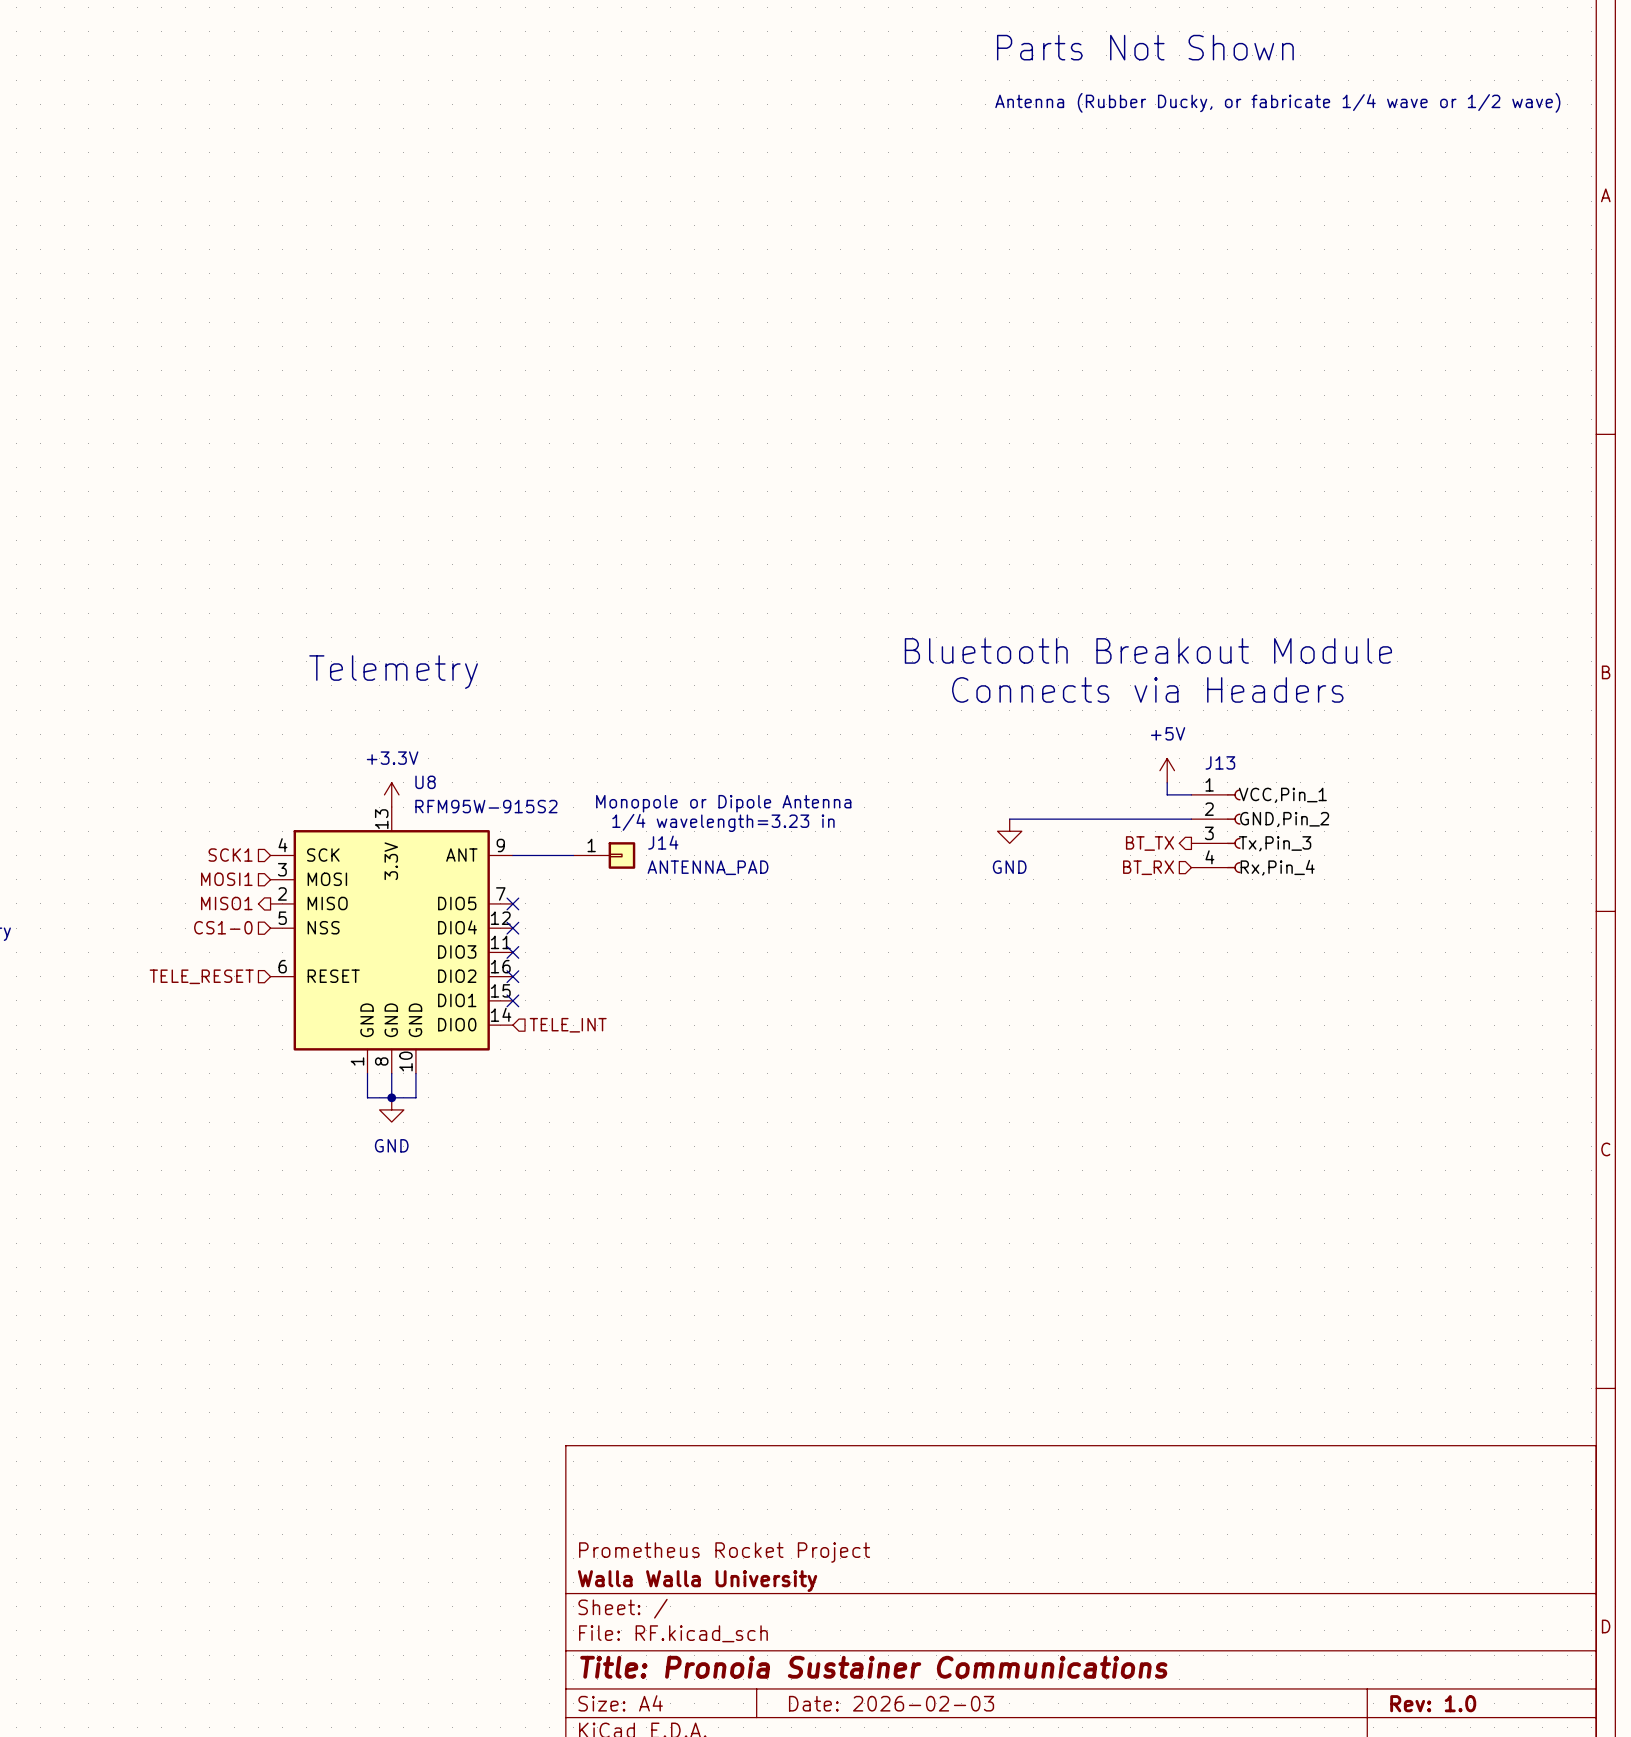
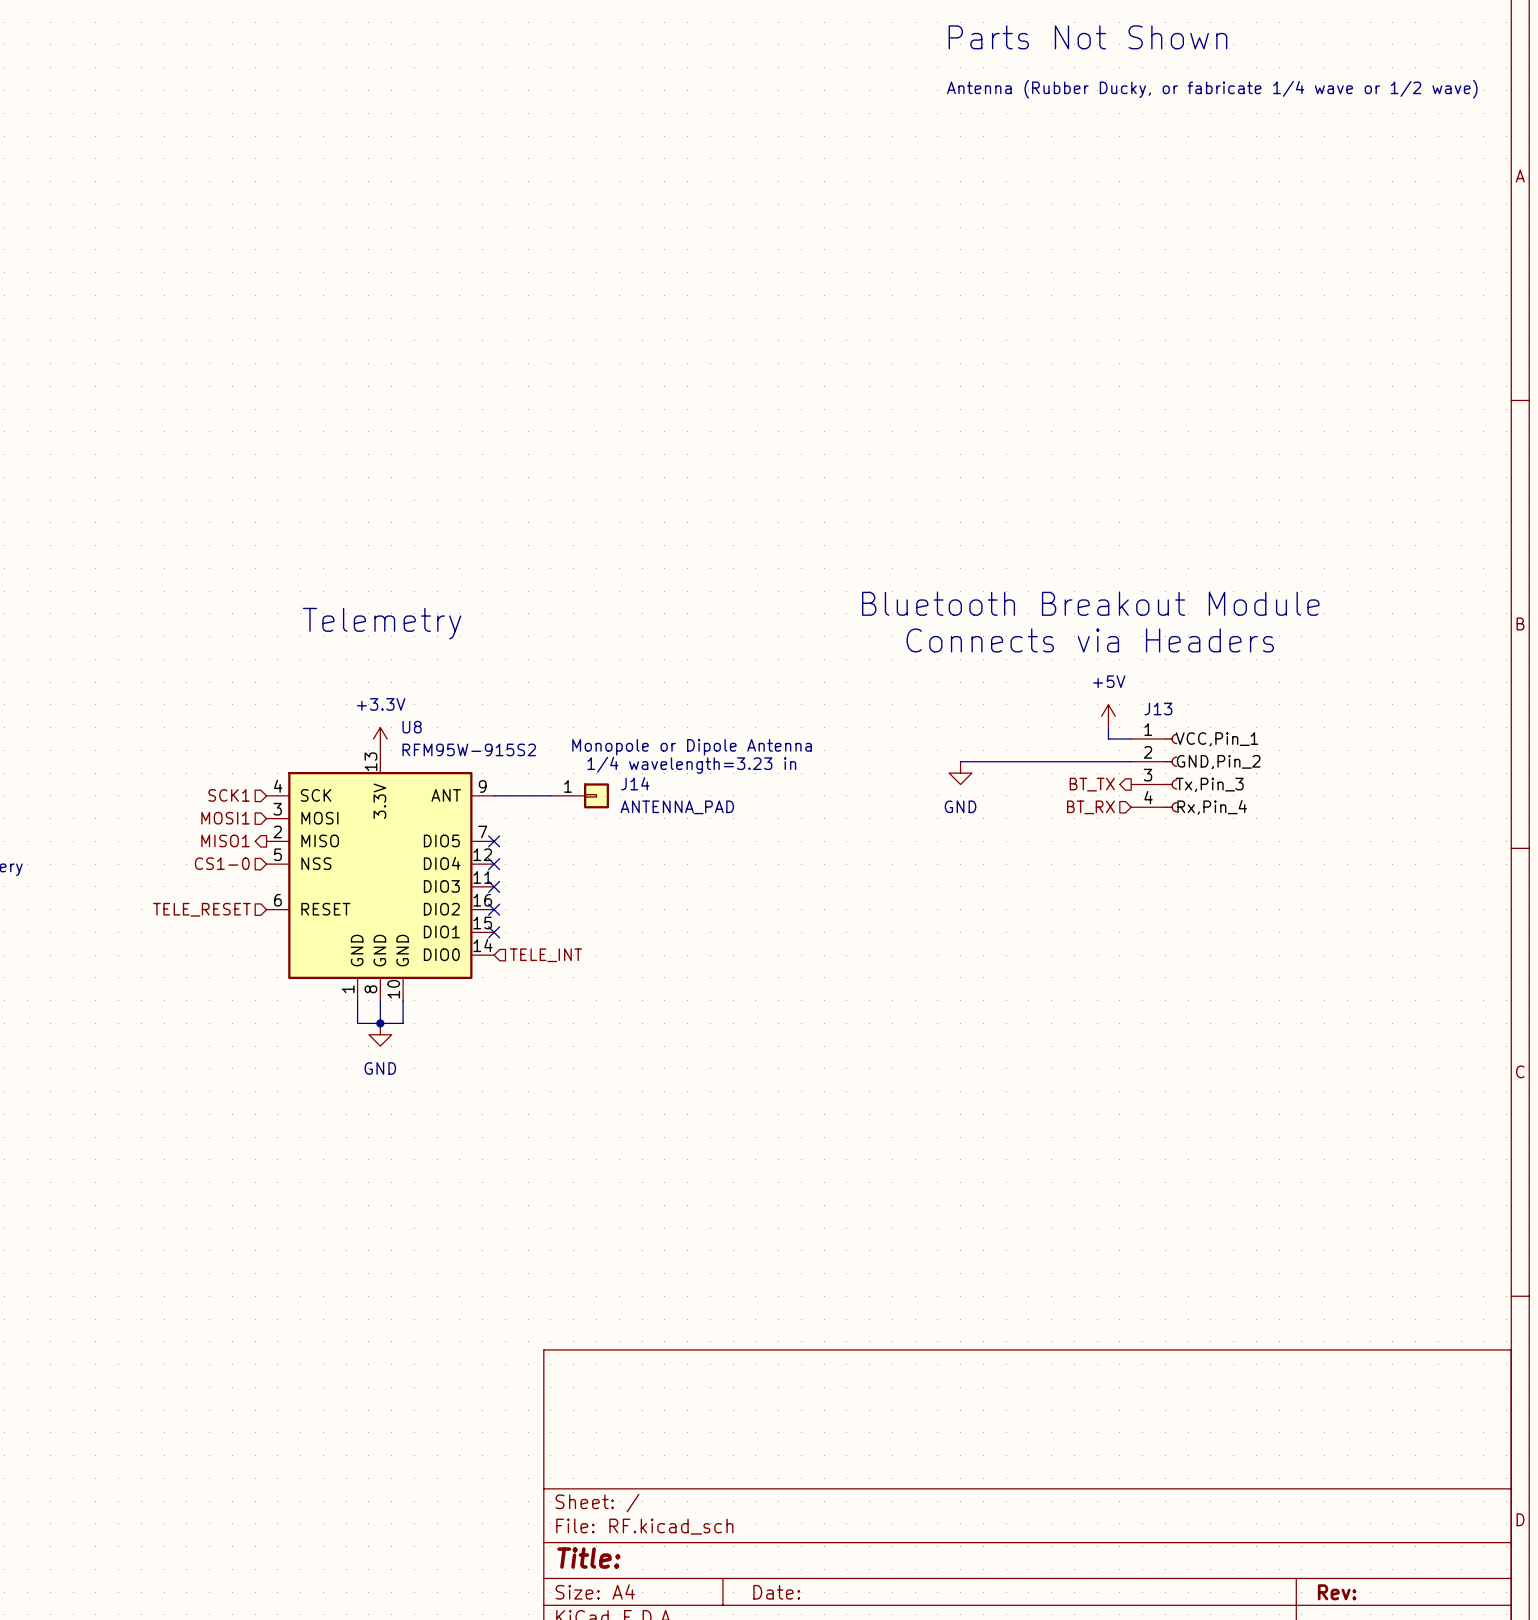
title block: Prometheus Rocket Project (724, 1552) -> none
title block: Walla Walla University (697, 1581) -> none
title block: Title: Pronoia Sustainer Communications (873, 1667) -> Title: (588, 1558)
title block: Date: 2026-02-03 (891, 1703) -> Date: (776, 1592)
title block: Rev: 1.0 (1433, 1703) -> Rev: (1337, 1592)

